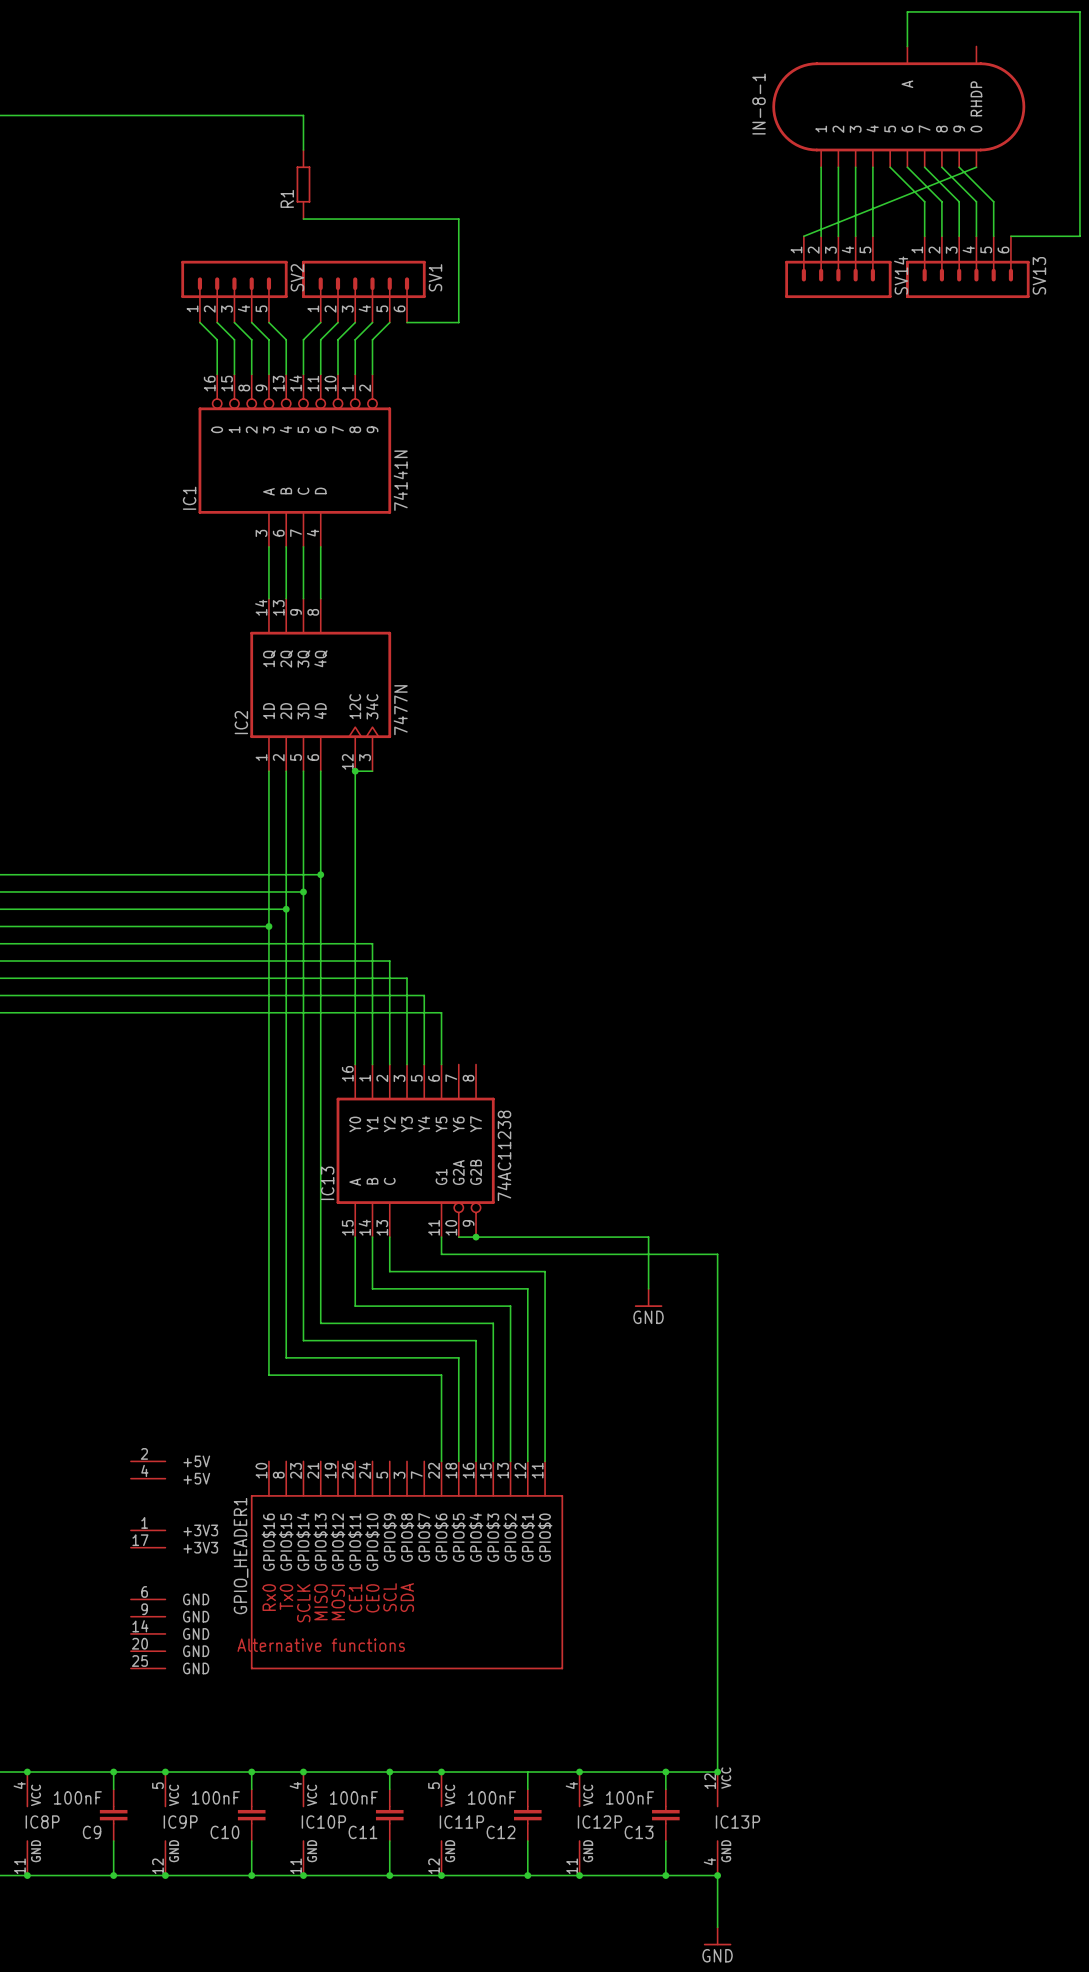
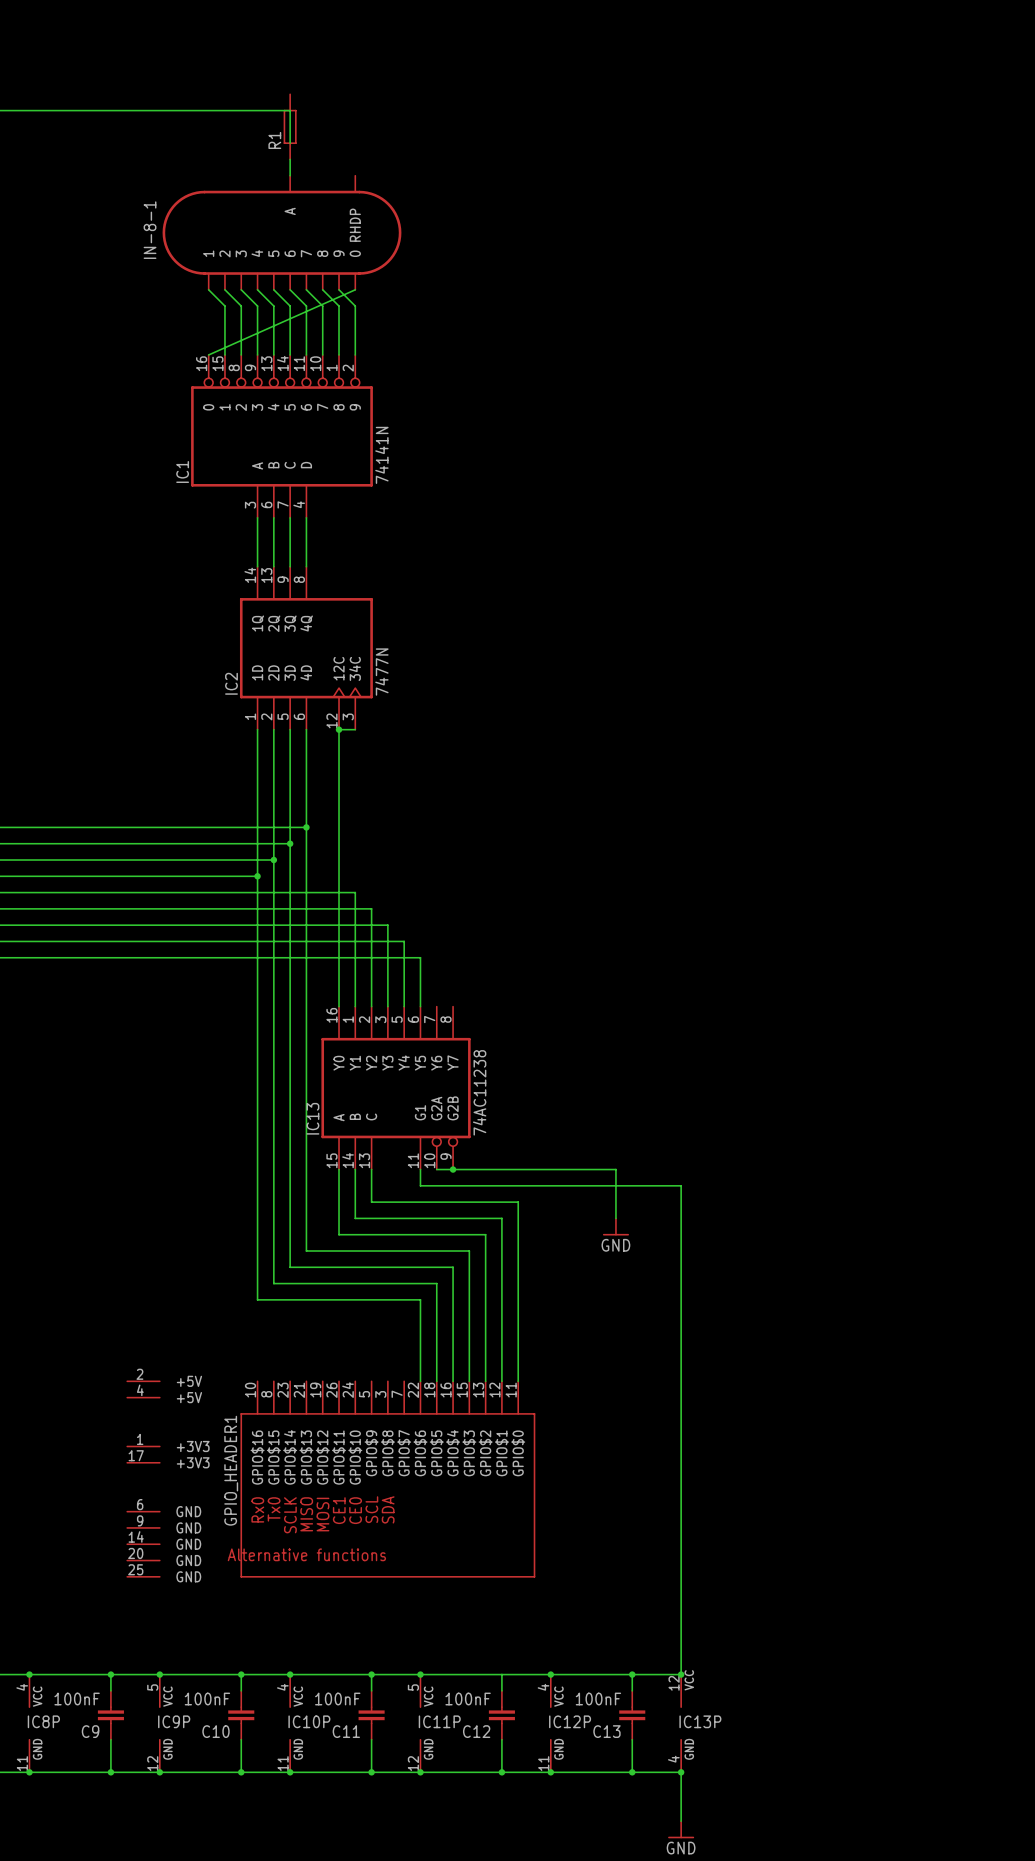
wire: (907, 46) (907, 11) (1079, 11) (1079, 236) (1010, 236) -> none
IN-8-1 position: (898, 106) -> (281, 232)
wire: none -> (290, 159) (290, 175)
wire: (821, 167) (821, 236) -> none
wire: (838, 167) (838, 236) -> none
wire: (855, 167) (855, 236) -> none
wire: (872, 167) (872, 236) -> none
wire: (890, 167) (924, 201) (924, 236) -> none
wire: (907, 167) (941, 201) (941, 236) -> none
wire: (924, 167) (959, 201) (959, 236) -> none
wire: (941, 167) (976, 201) (976, 236) -> none
wire: (959, 167) (993, 201) (993, 236) -> none
wire: (976, 167) (803, 236) -> none
R1 position: (303, 184) -> (290, 126)
wire: (303, 219) (458, 219) (458, 322) (407, 322) -> none
SV14: (838, 267) -> none
SV13: (967, 267) -> none
SV2: (234, 291) -> none
SV1: (363, 291) -> none
wire: (199, 322) (217, 339) (217, 374) -> (355, 289) (208, 354)
wire: (217, 322) (234, 339) -> (208, 289) (224, 306) (224, 322)
wire: (234, 322) (251, 339) -> (224, 289) (241, 306) (241, 322)
wire: (251, 322) (268, 339) -> (241, 289) (257, 306) (257, 322)
wire: (268, 322) (286, 339) -> (257, 289) (273, 306) (273, 322)
wire: (320, 322) (303, 339) -> (273, 289) (290, 306) (290, 322)
wire: (337, 322) (320, 339) -> (290, 289) (306, 306) (306, 322)
wire: (355, 322) (337, 339) -> (306, 289) (322, 306) (322, 322)
wire: (372, 322) (355, 339) -> (322, 289) (339, 306) (339, 322)
wire: (389, 322) (372, 339) -> (339, 289) (355, 306) (355, 322)

